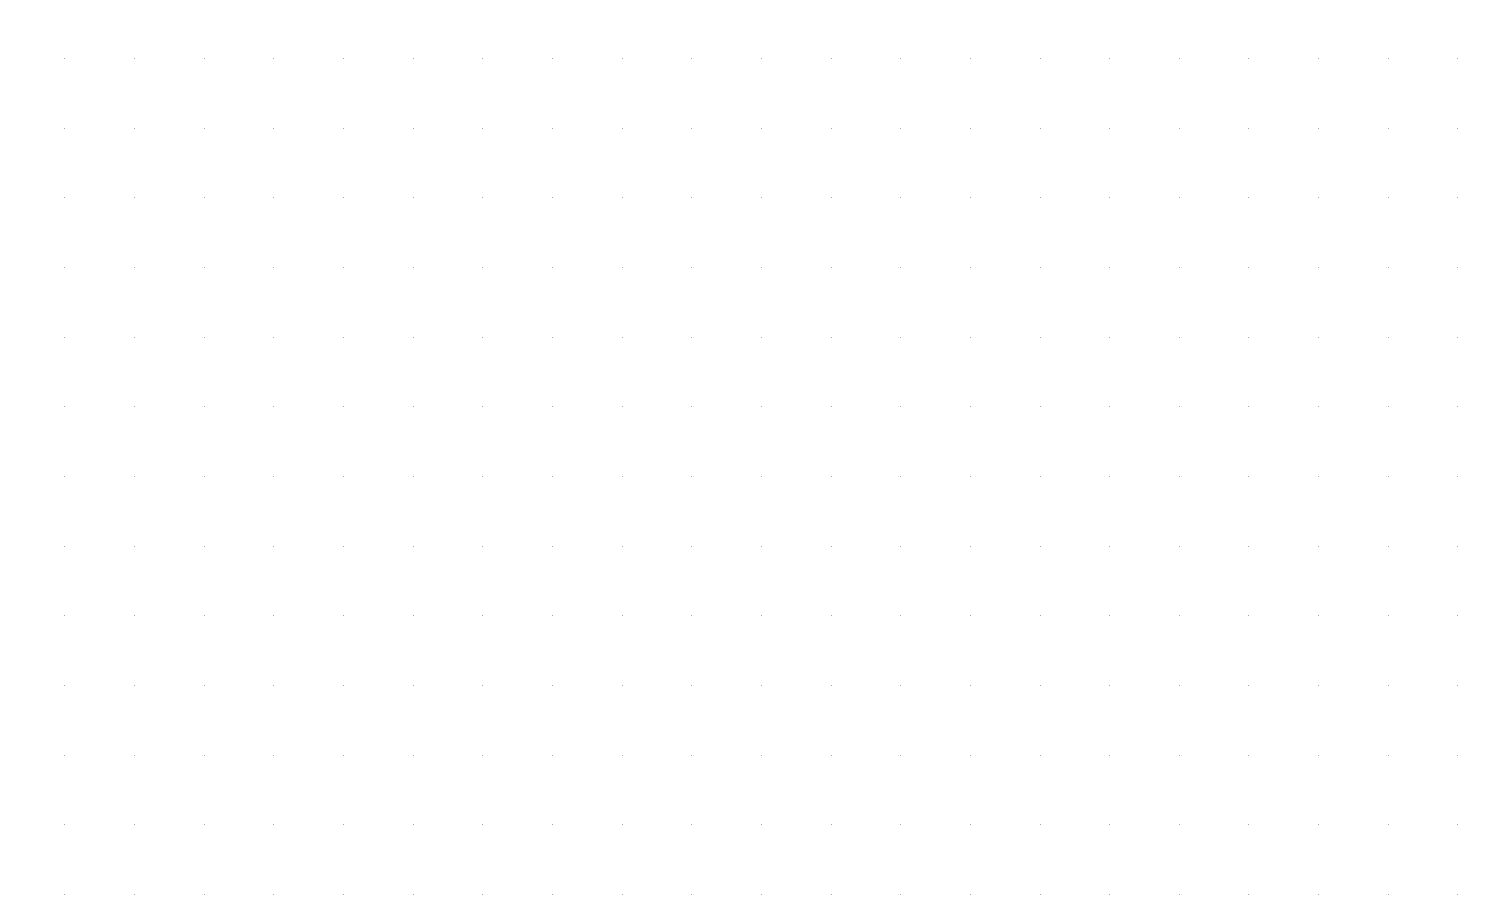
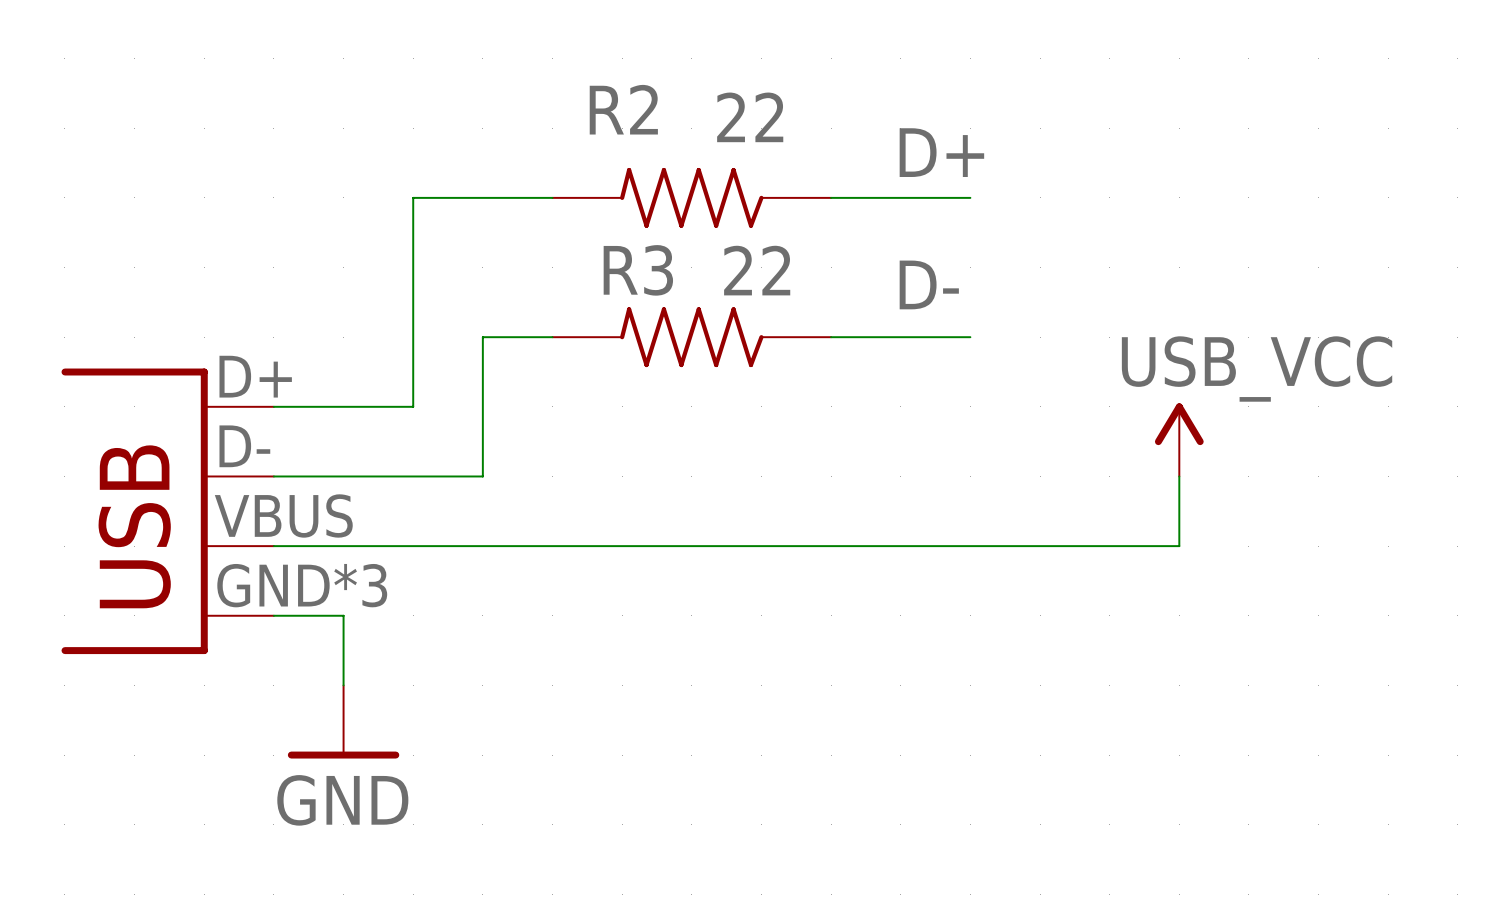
label: none -> D+ (941, 152)
wire: none -> (552, 197) (413, 197) (413, 406) (273, 406)
R2: none -> 22 (691, 197)
wire: none -> (831, 197) (970, 197)
label: none -> D- (929, 284)
wire: none -> (552, 337) (482, 337) (482, 476) (273, 476)
R3: none -> 22 (691, 337)
wire: none -> (831, 337) (970, 337)
power symbol: none -> USB_VCC (1179, 439)
wire: none -> (1179, 476) (1179, 546) (273, 546)
part: none -> (167, 511)
wire: none -> (273, 615) (343, 615) (343, 685)
power symbol: none -> GND (343, 721)

